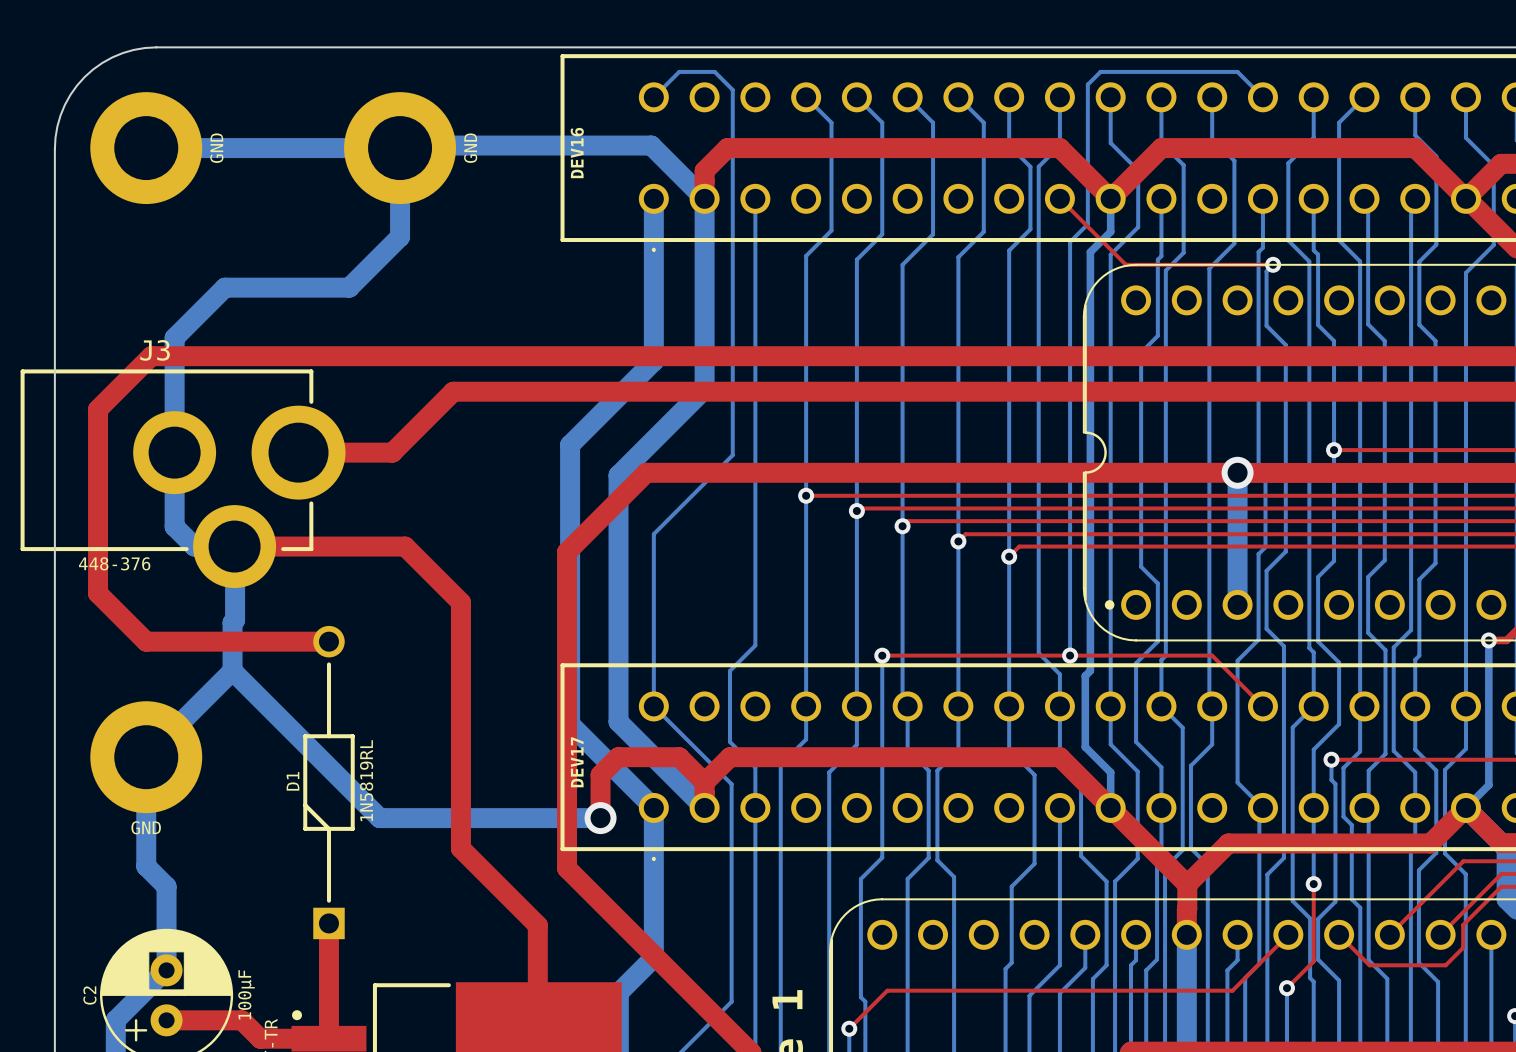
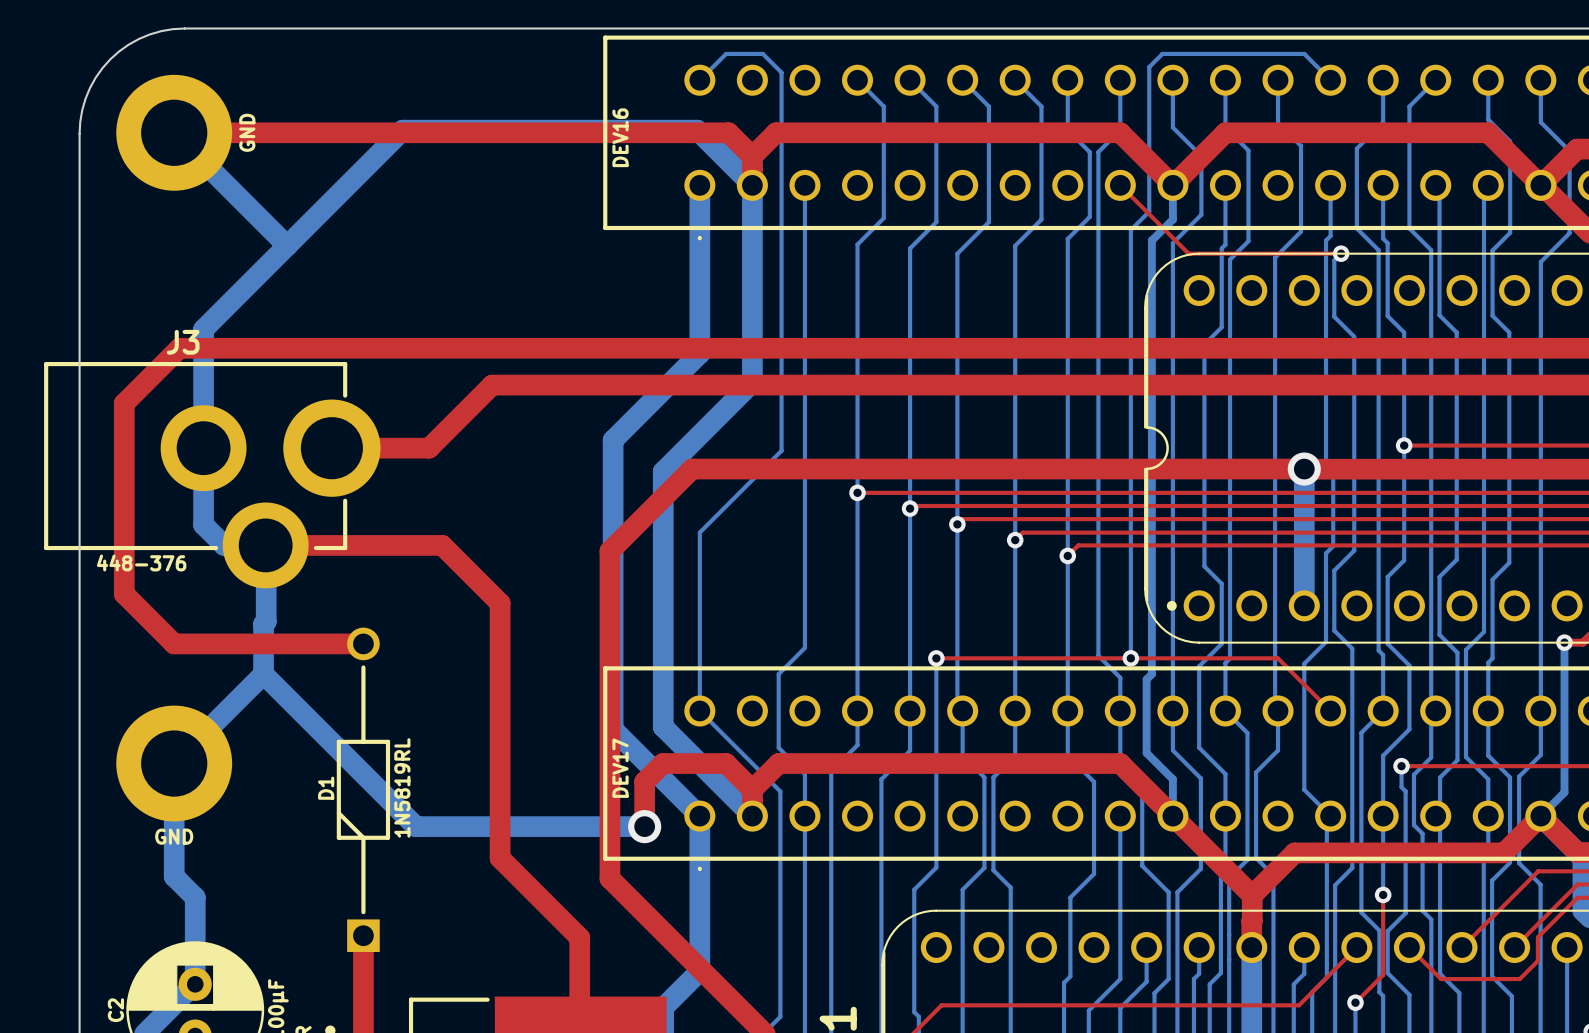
bottom track: none -> (439, 130) (402, 130) (255, 277)
top track: none -> (174, 132) (728, 132) (752, 156)
bottom track: (146, 148) (400, 148) (400, 236) (349, 287) (224, 287) -> (174, 132) (287, 245)
part: (400, 148) -> none

